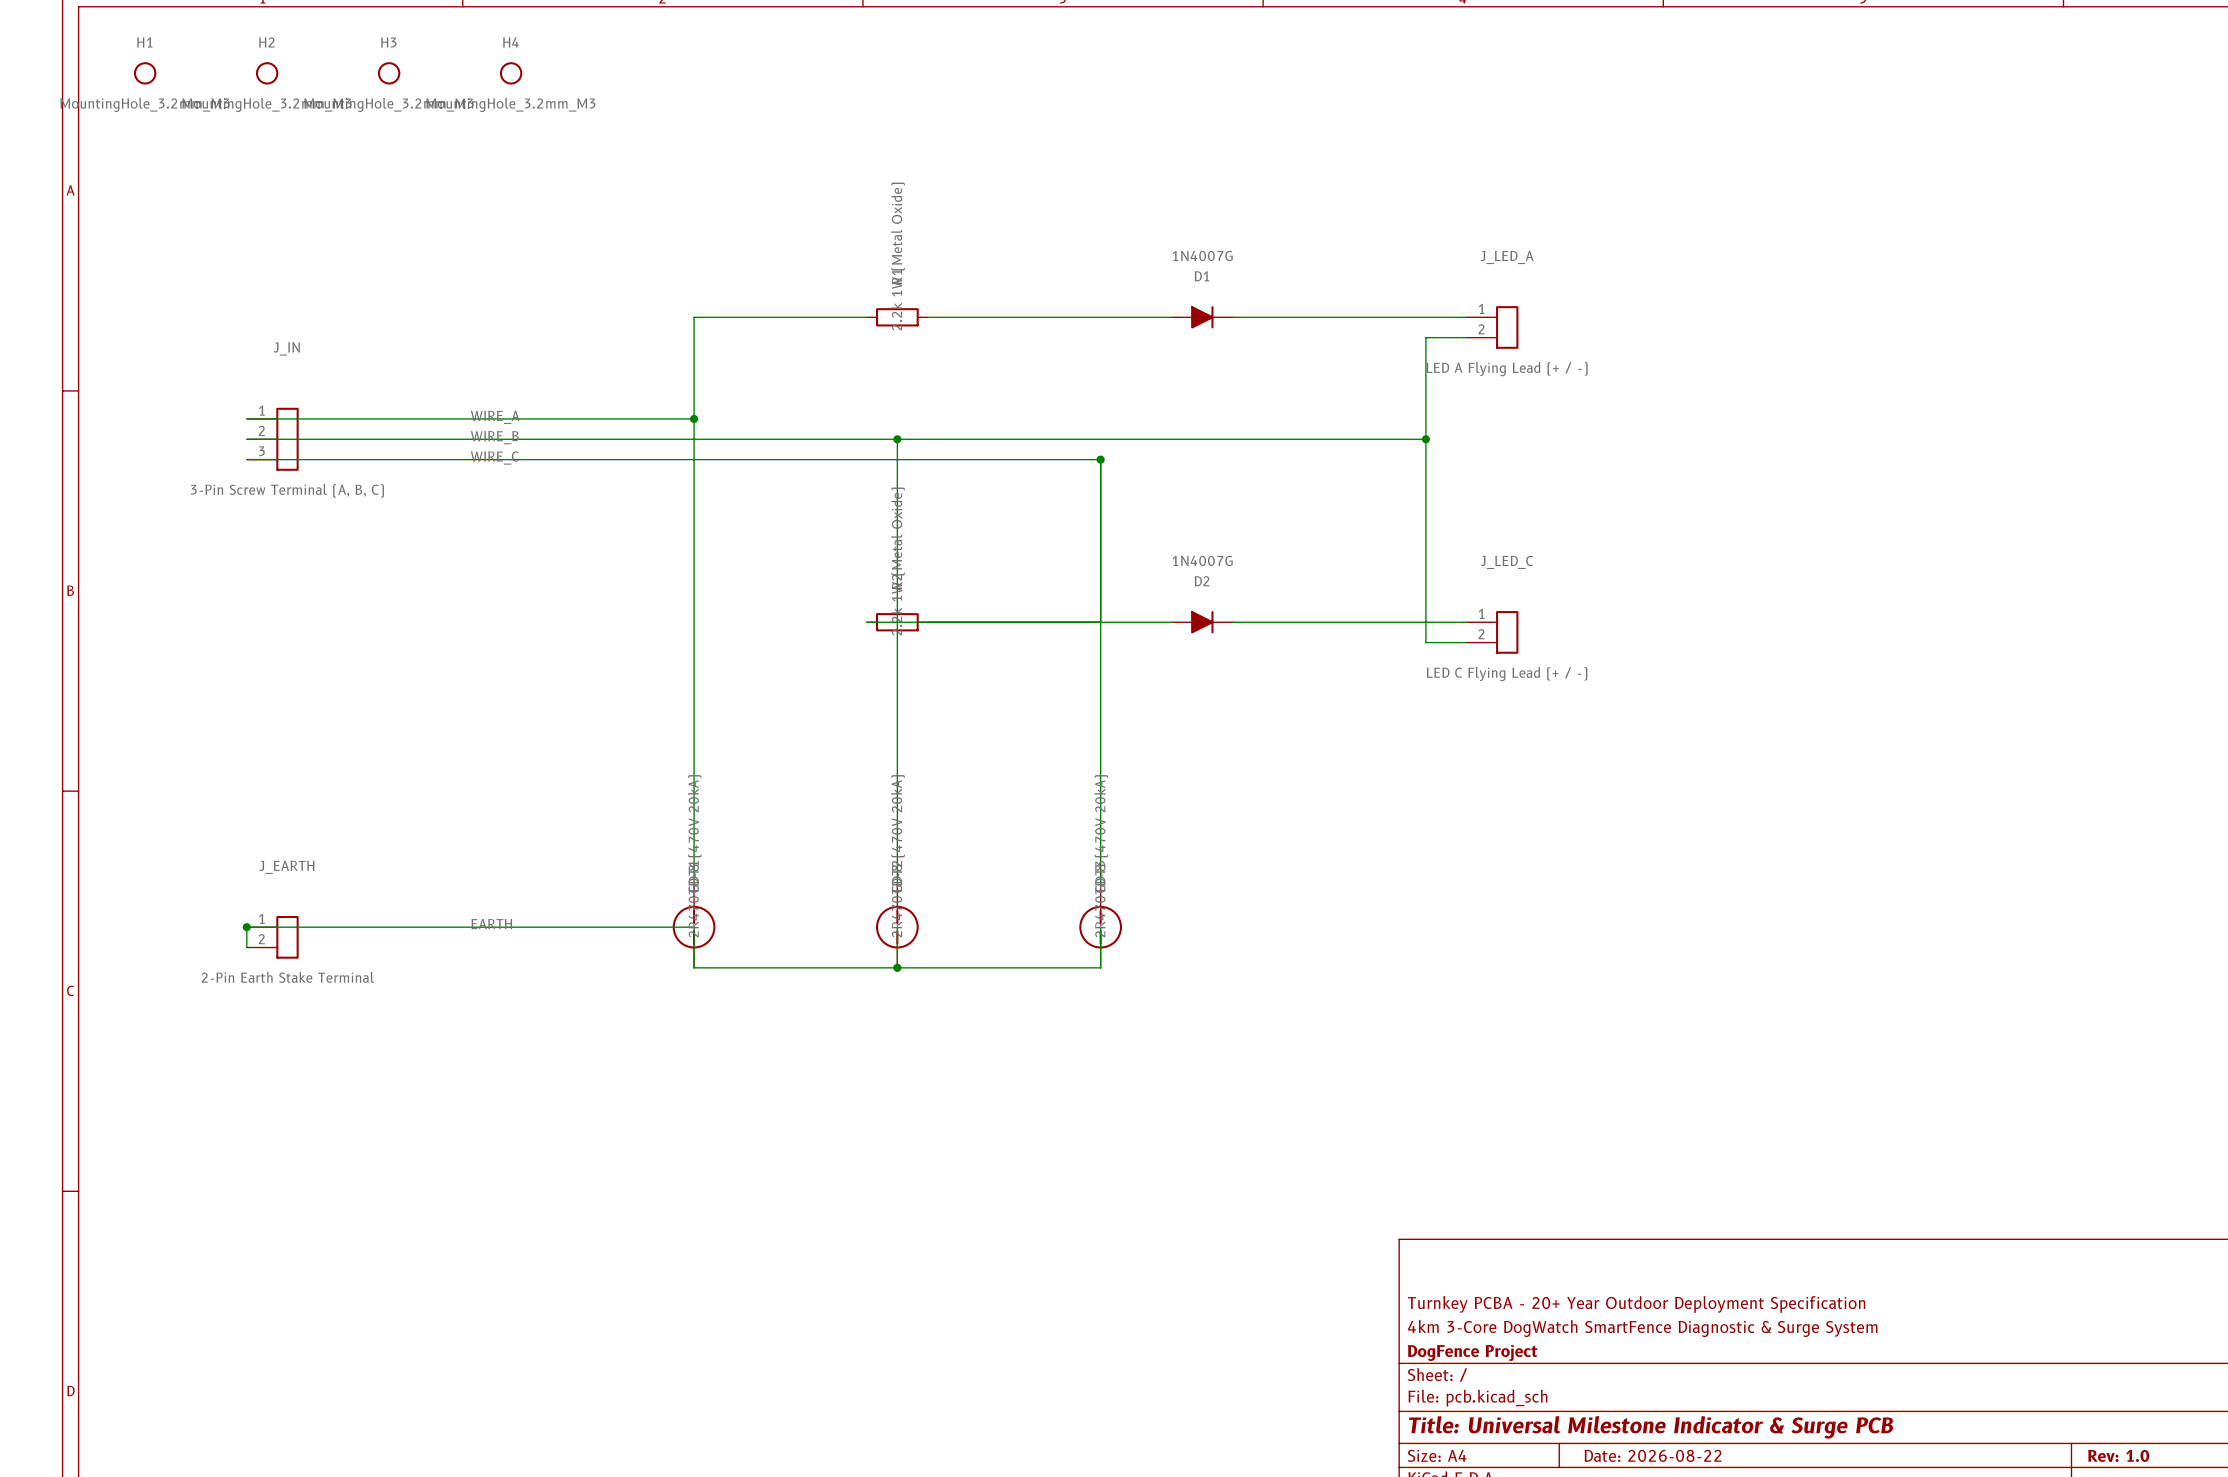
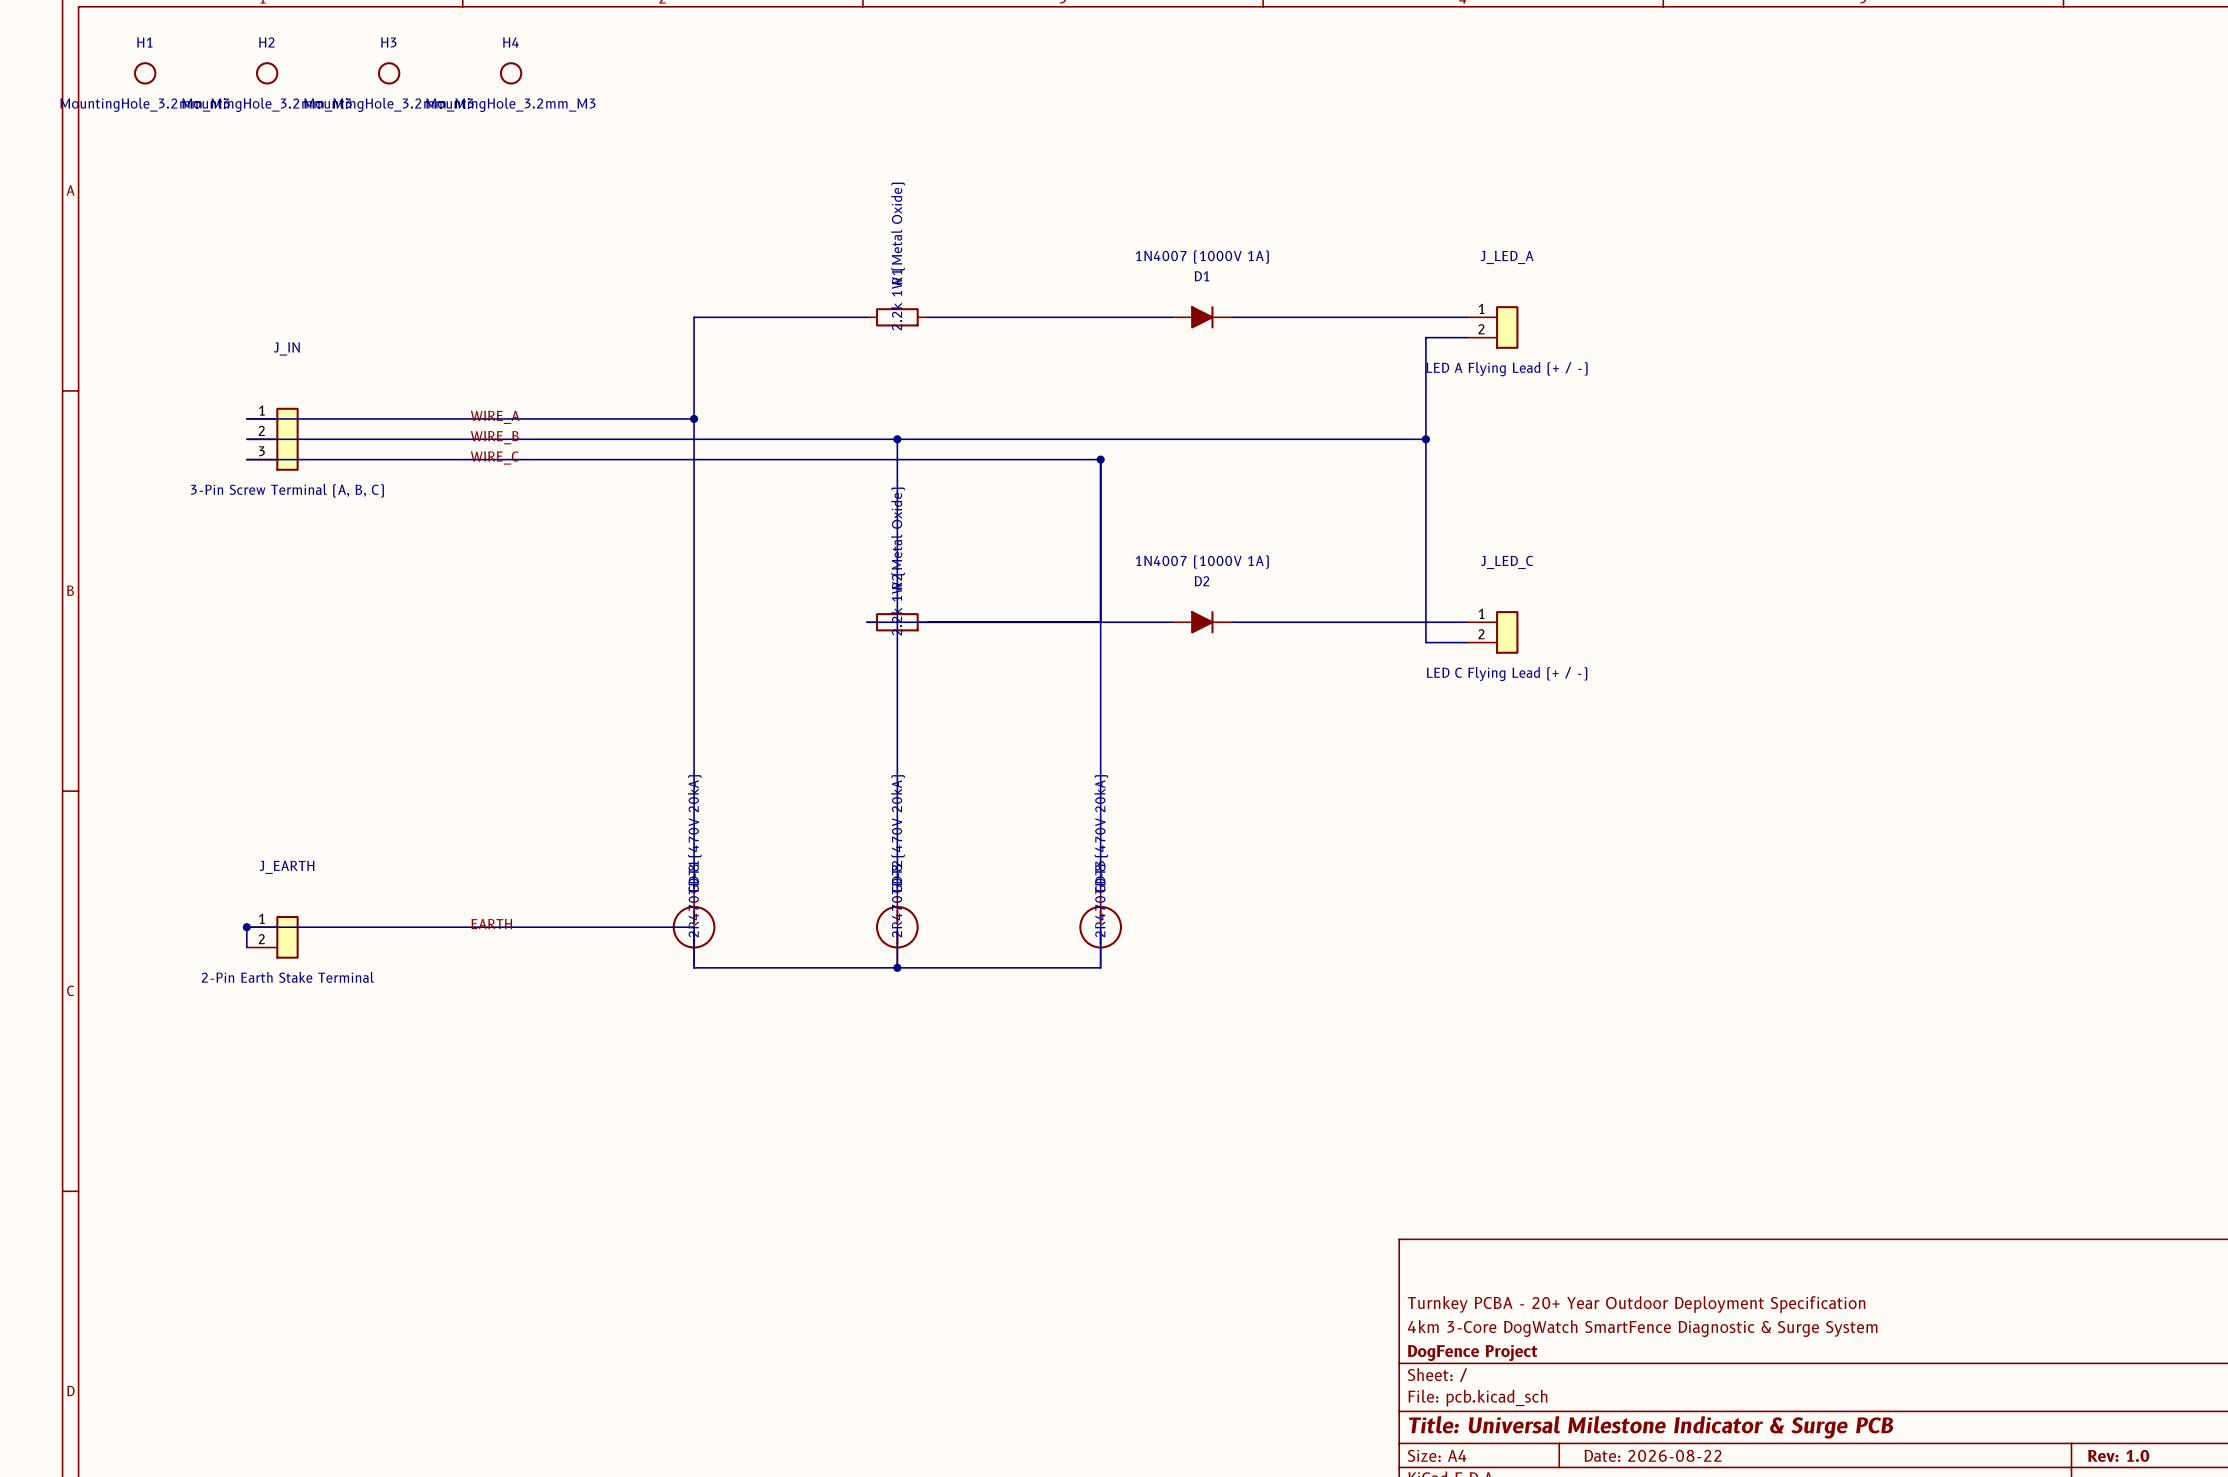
D1 value: 1N4007G (1202, 256) -> 1N4007 (1000V 1A) (1202, 257)
D2 value: 1N4007G (1202, 560) -> 1N4007 (1000V 1A) (1202, 562)

